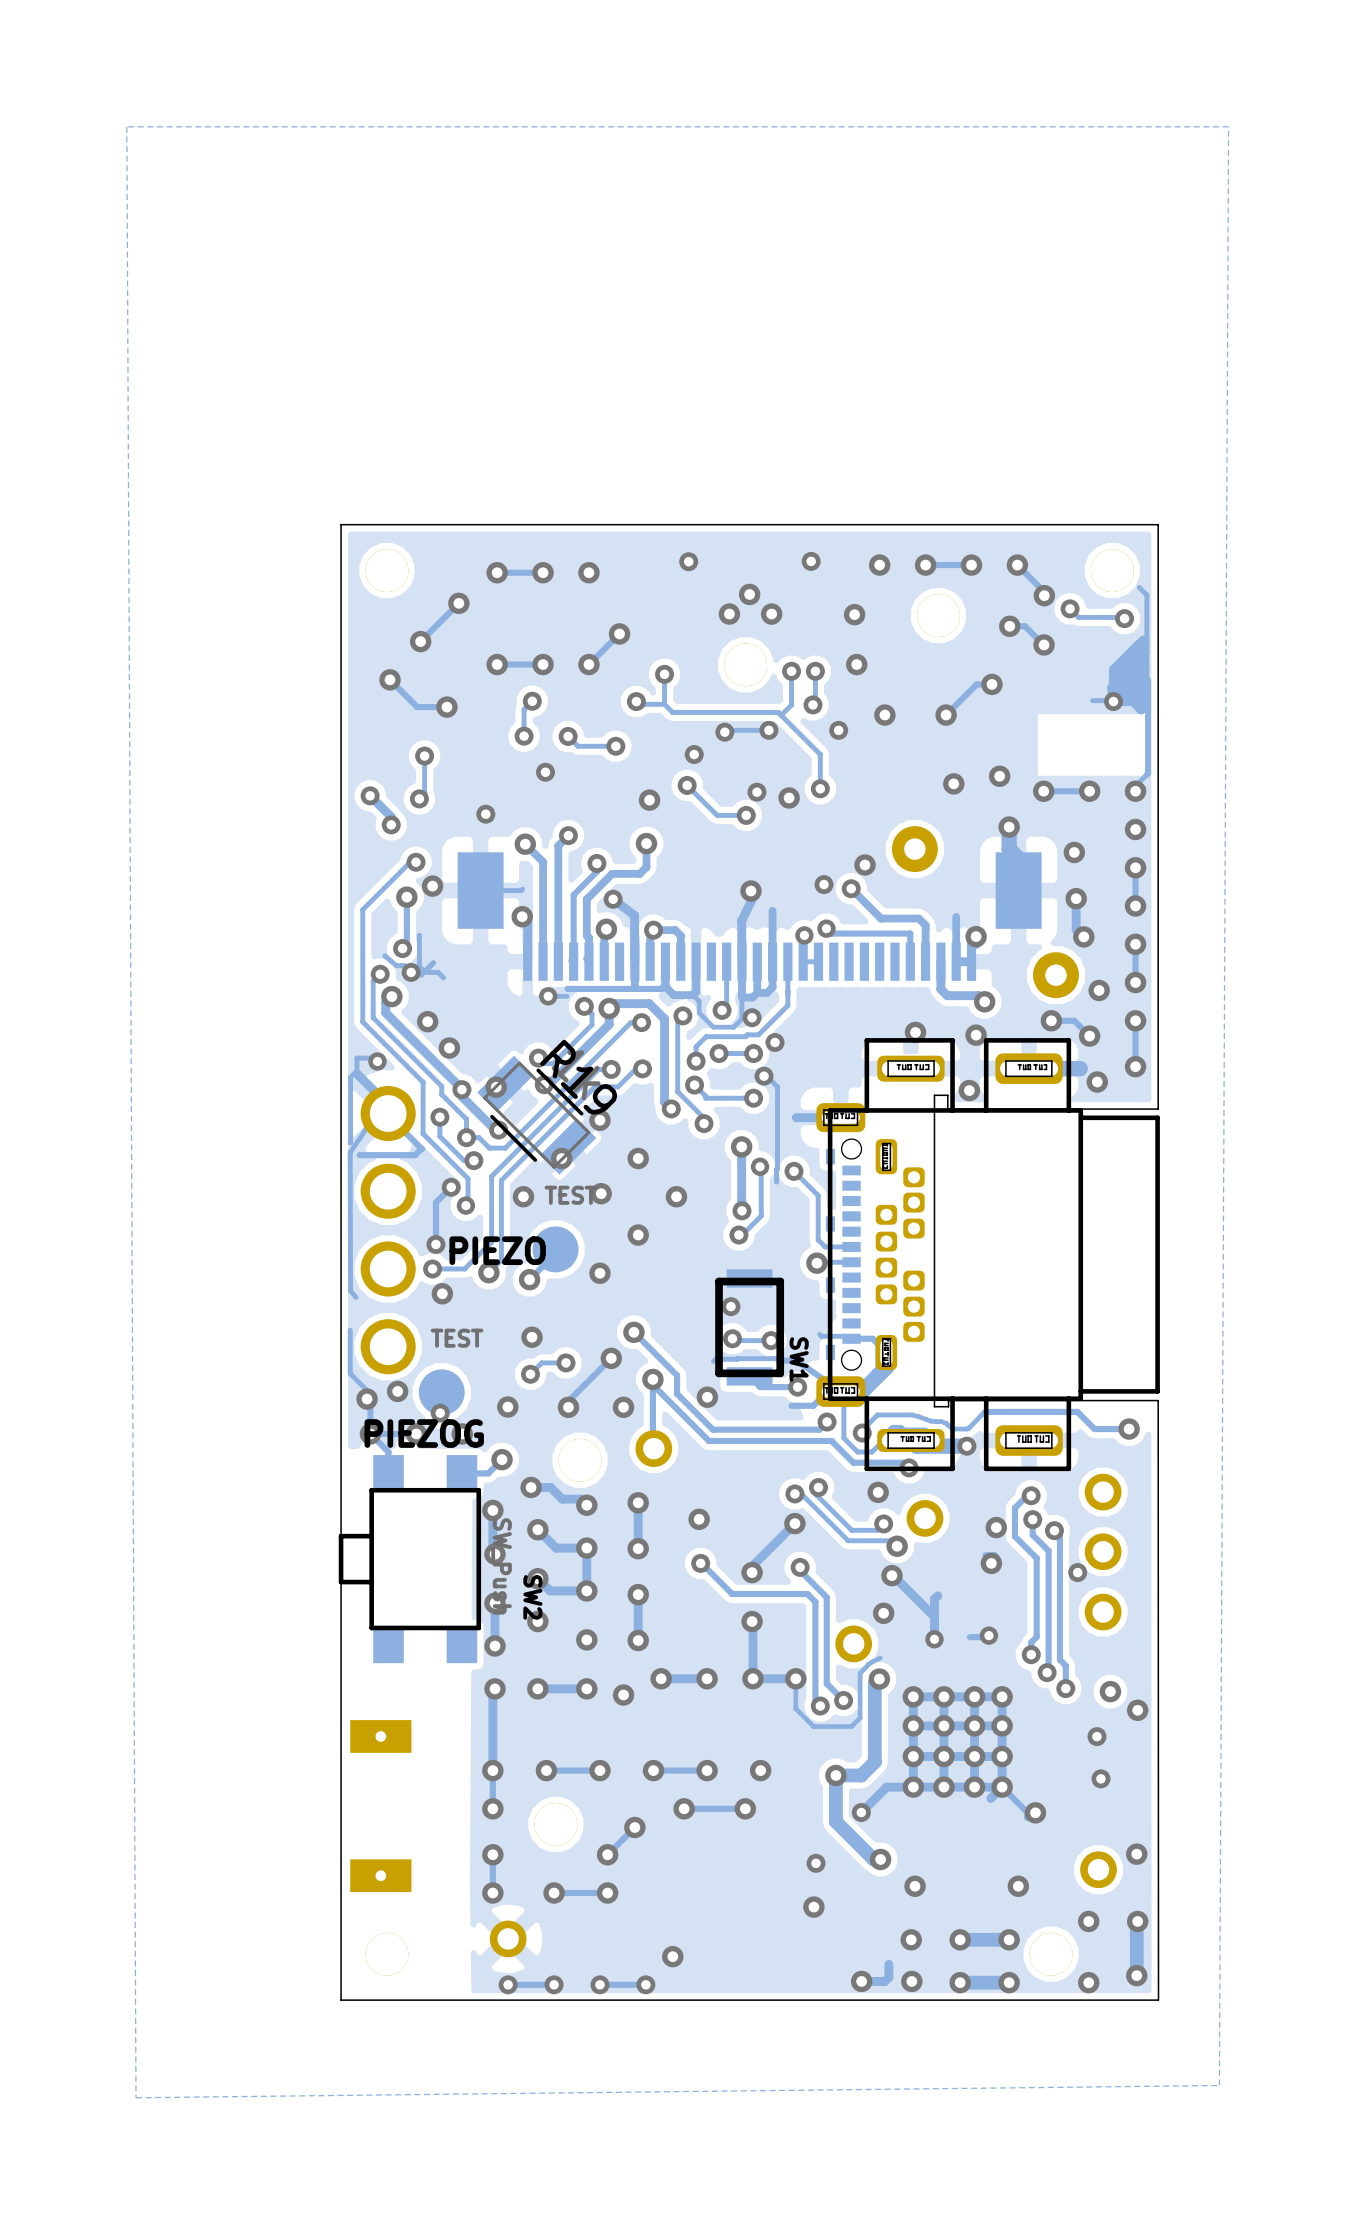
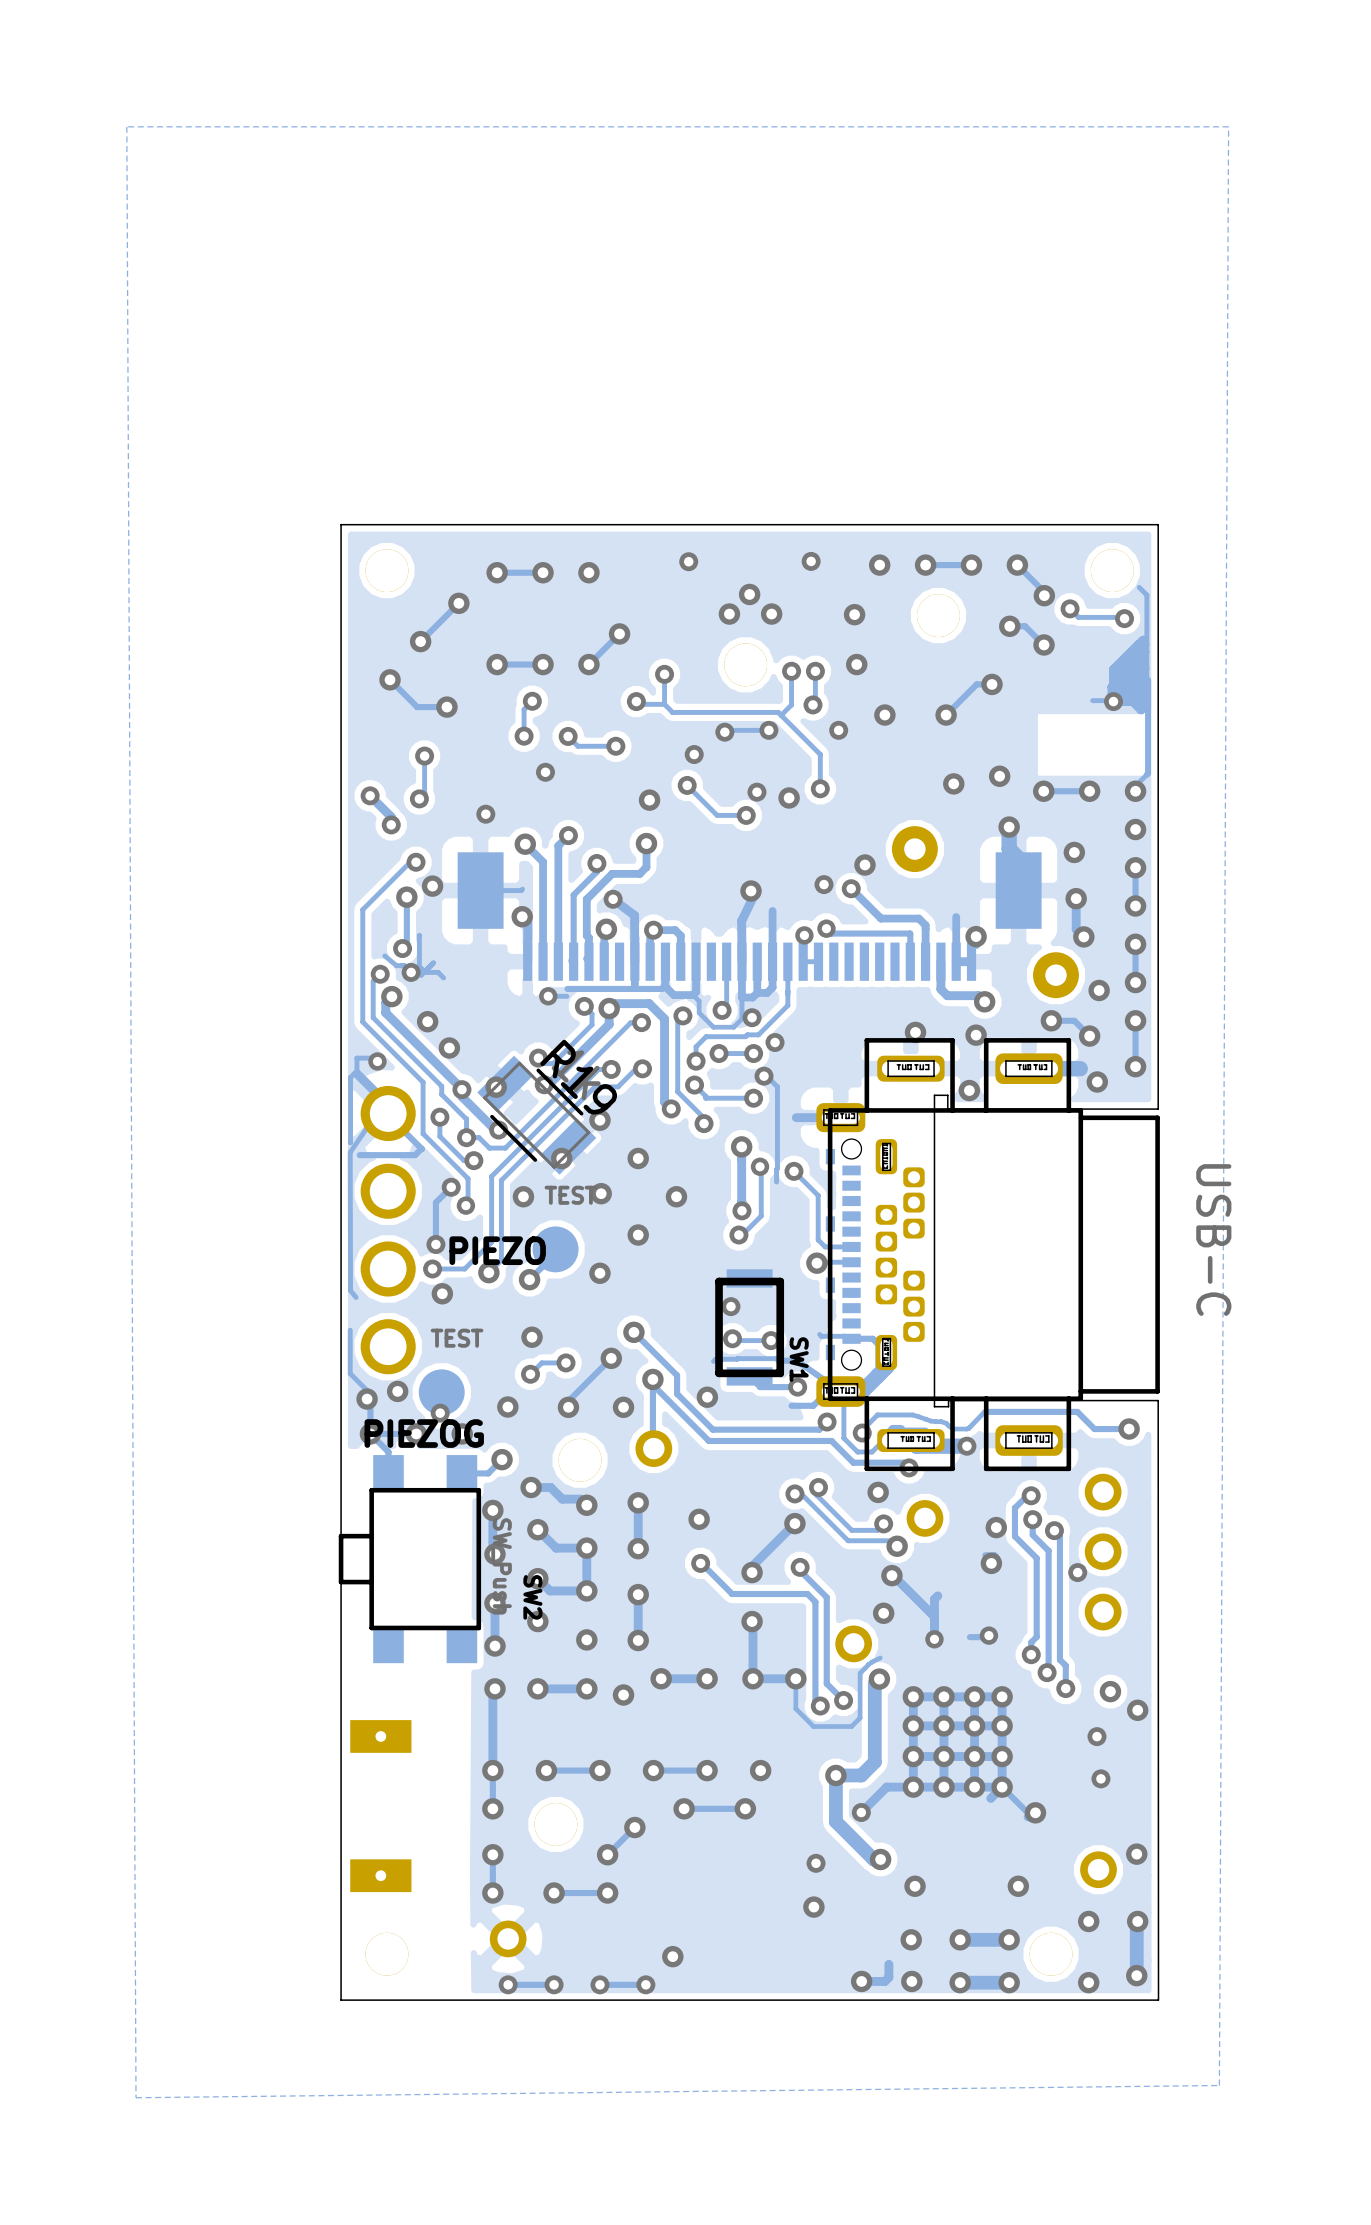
part value: none -> USB-C (1213, 1240)

